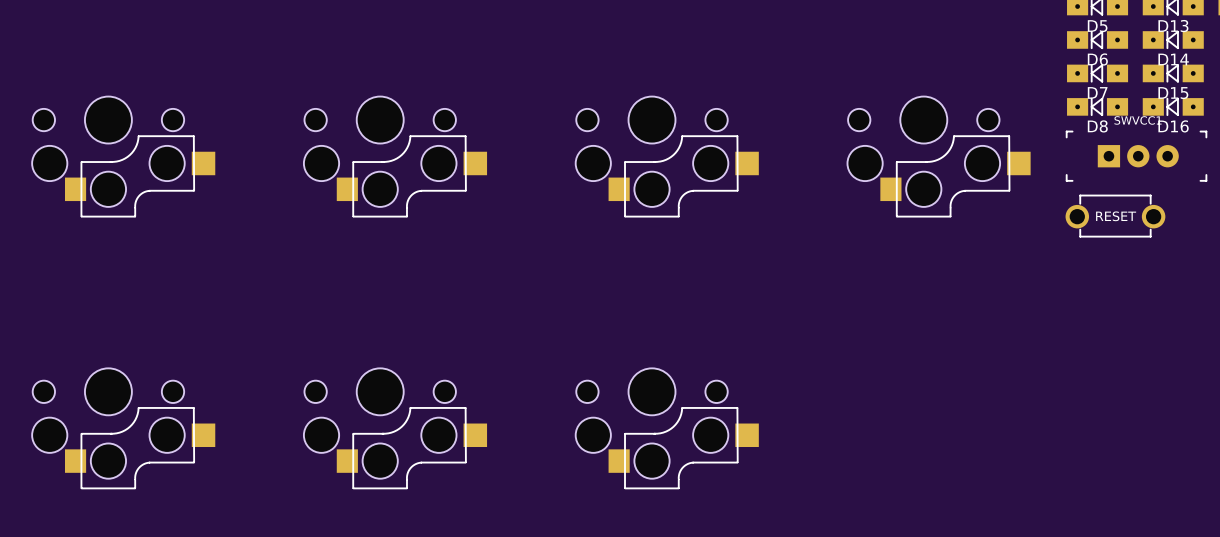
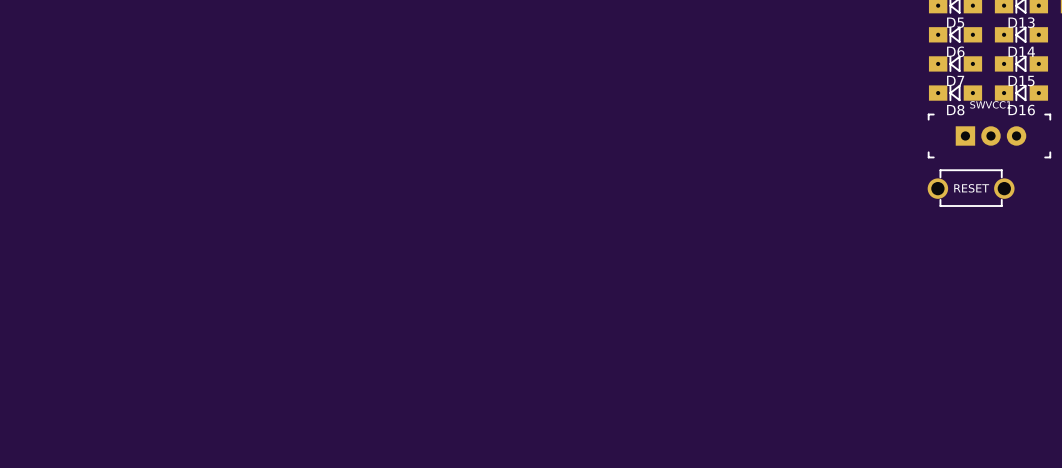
part: (123, 157) -> none
part: (395, 157) -> none
part: (667, 157) -> none
part: (939, 157) -> none
part: (123, 428) -> none
part: (395, 428) -> none
part: (667, 428) -> none

